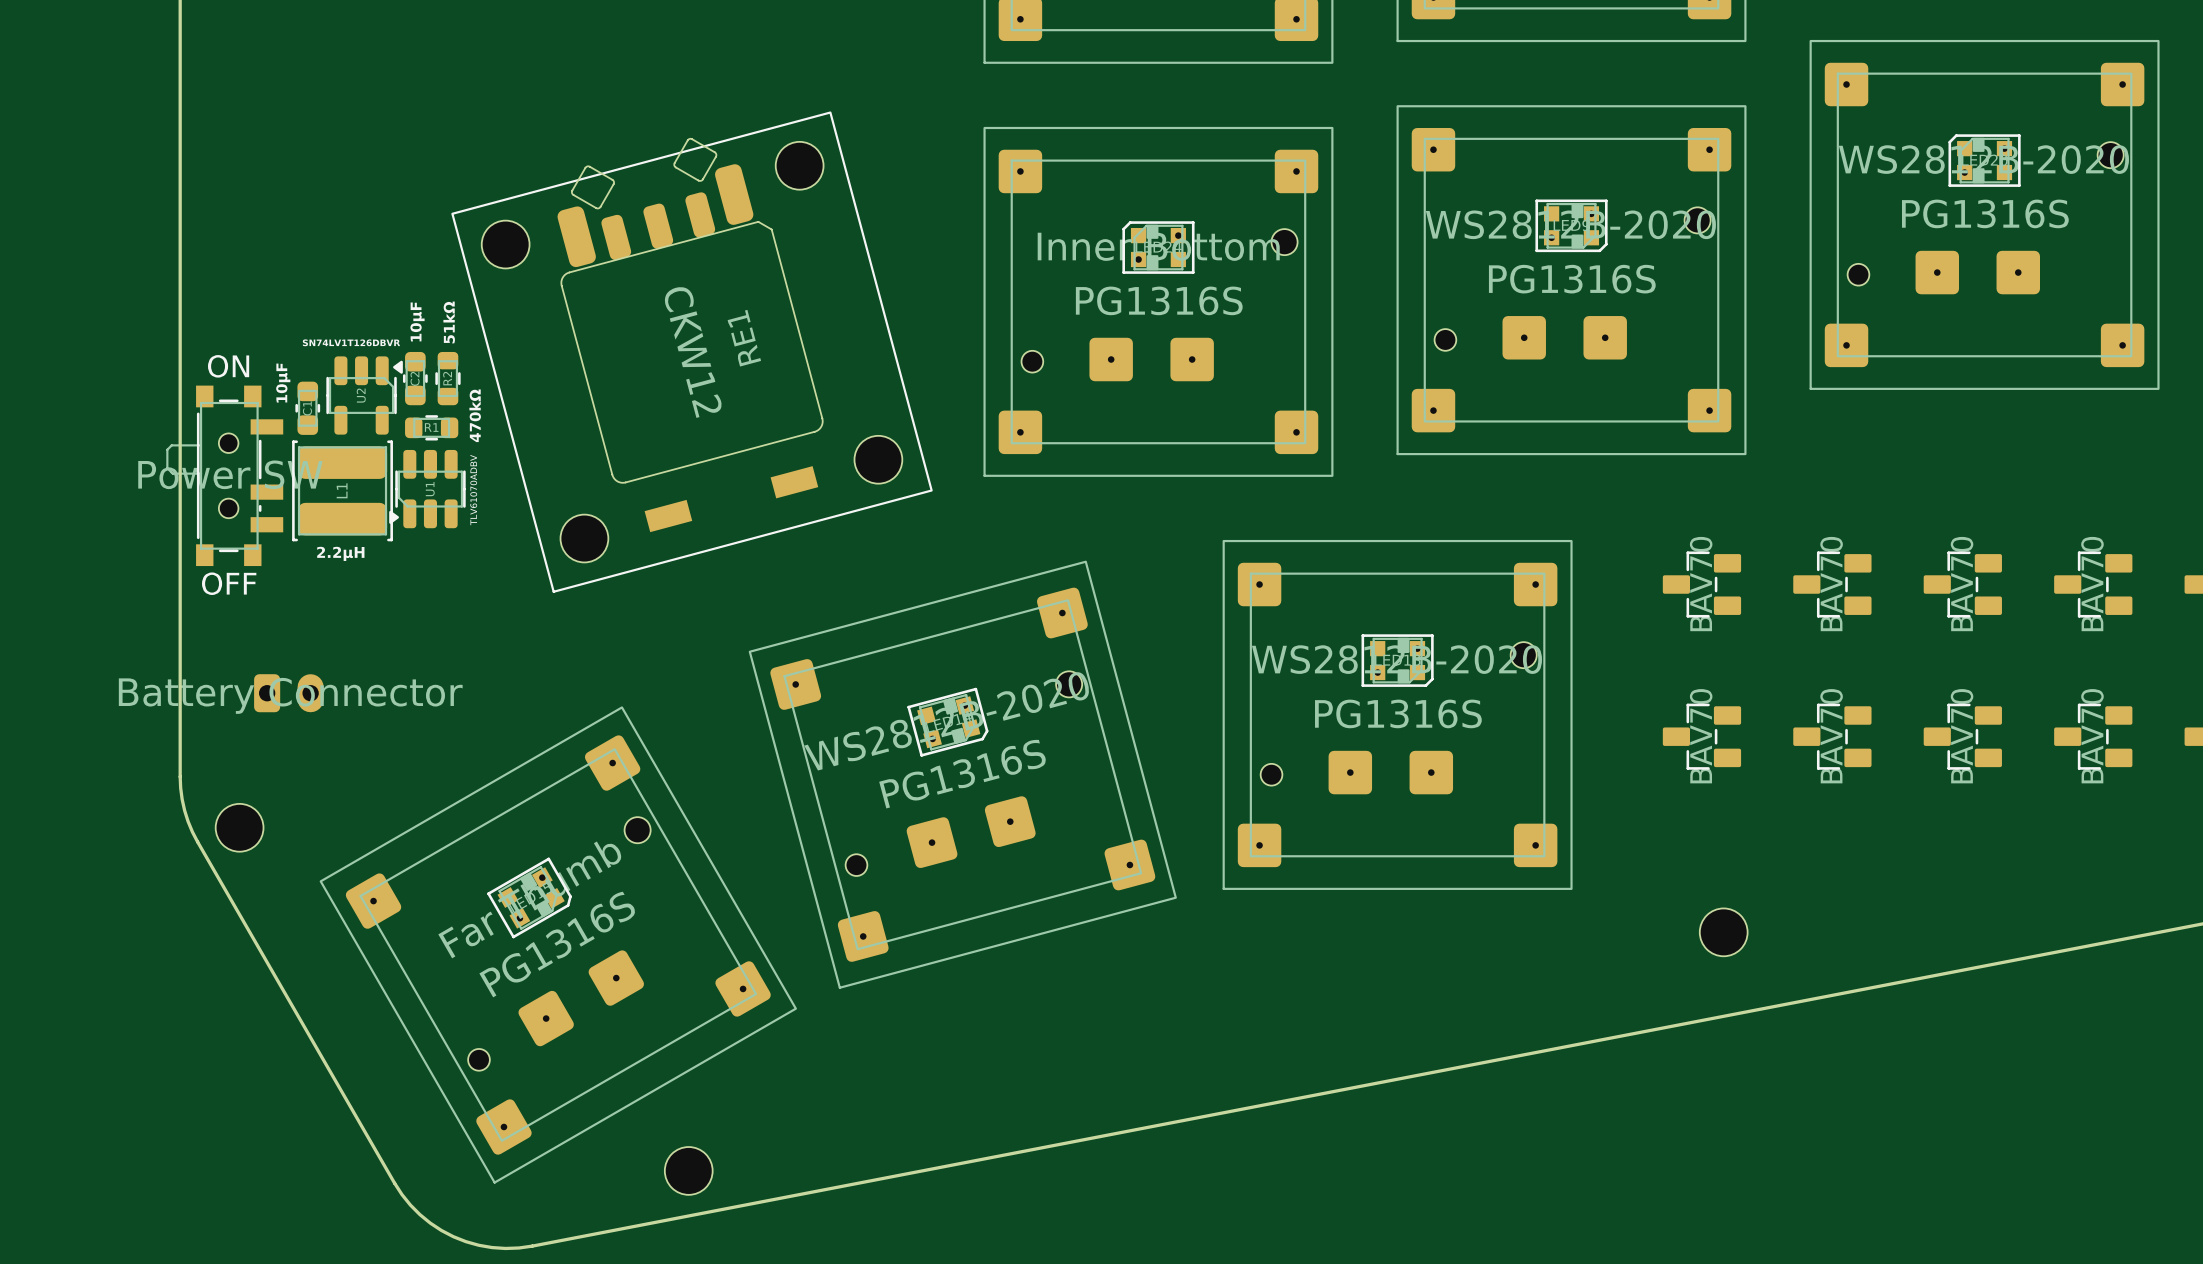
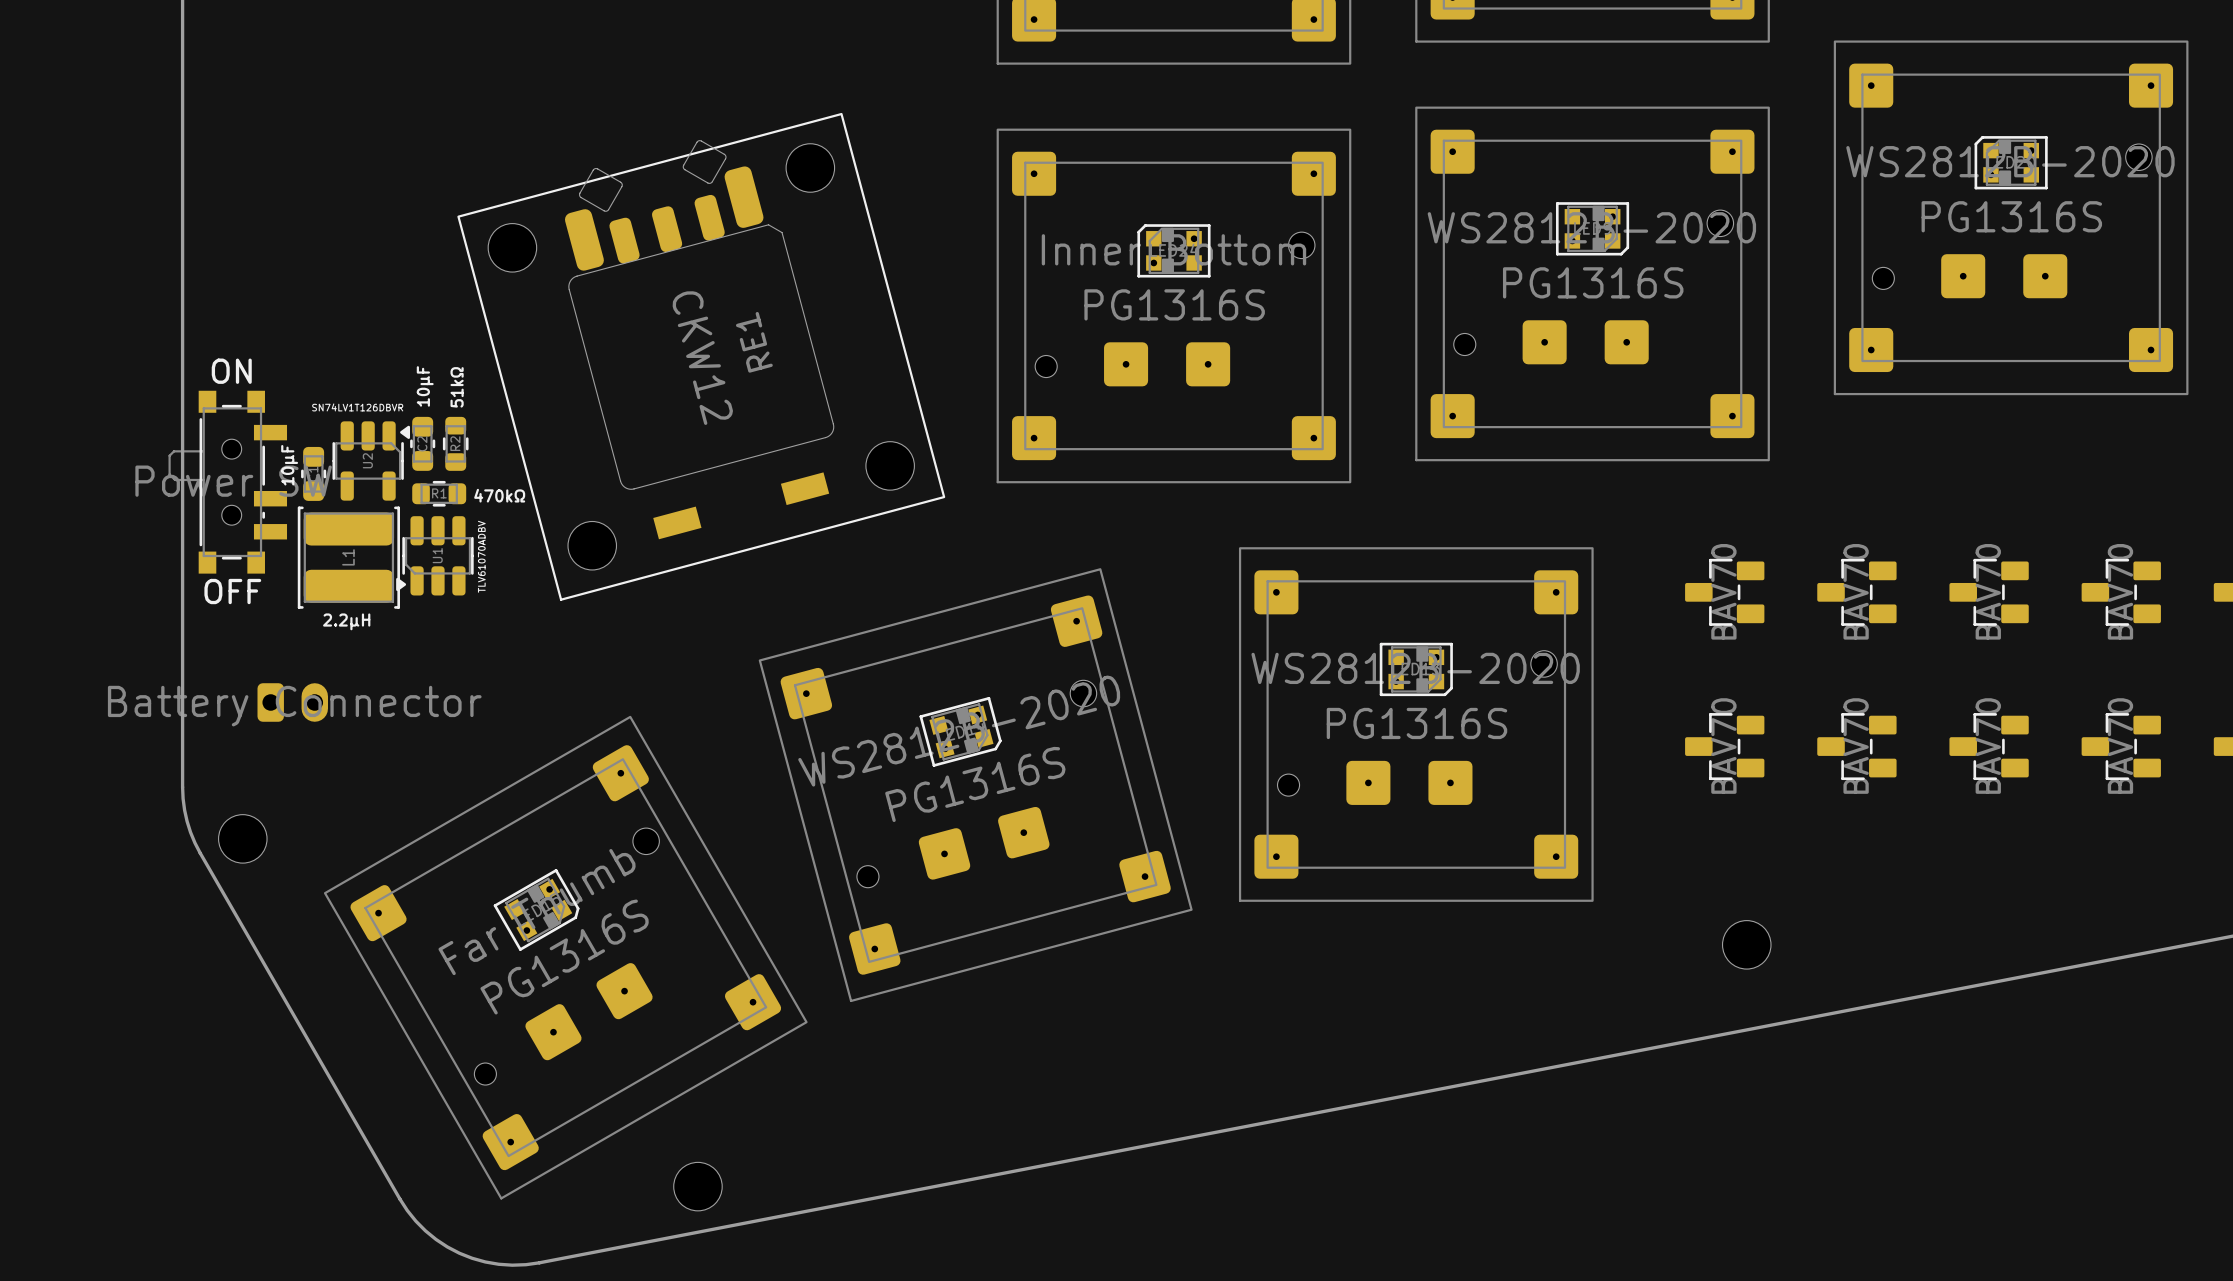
C2 position: (415, 378) -> (422, 443)
R2 position: (447, 378) -> (455, 443)
C1 value position: 10μF (283, 383) -> 10μF (289, 465)
U2 position: (364, 395) -> (371, 460)
C1 position: (307, 408) -> (313, 473)
R1 value rotation: 0° (475, 415) -> 90° clockwise (499, 495)
R1 position: (431, 427) -> (439, 493)
U1 position: (427, 489) -> (434, 555)
L1 position: (342, 490) -> (348, 557)

